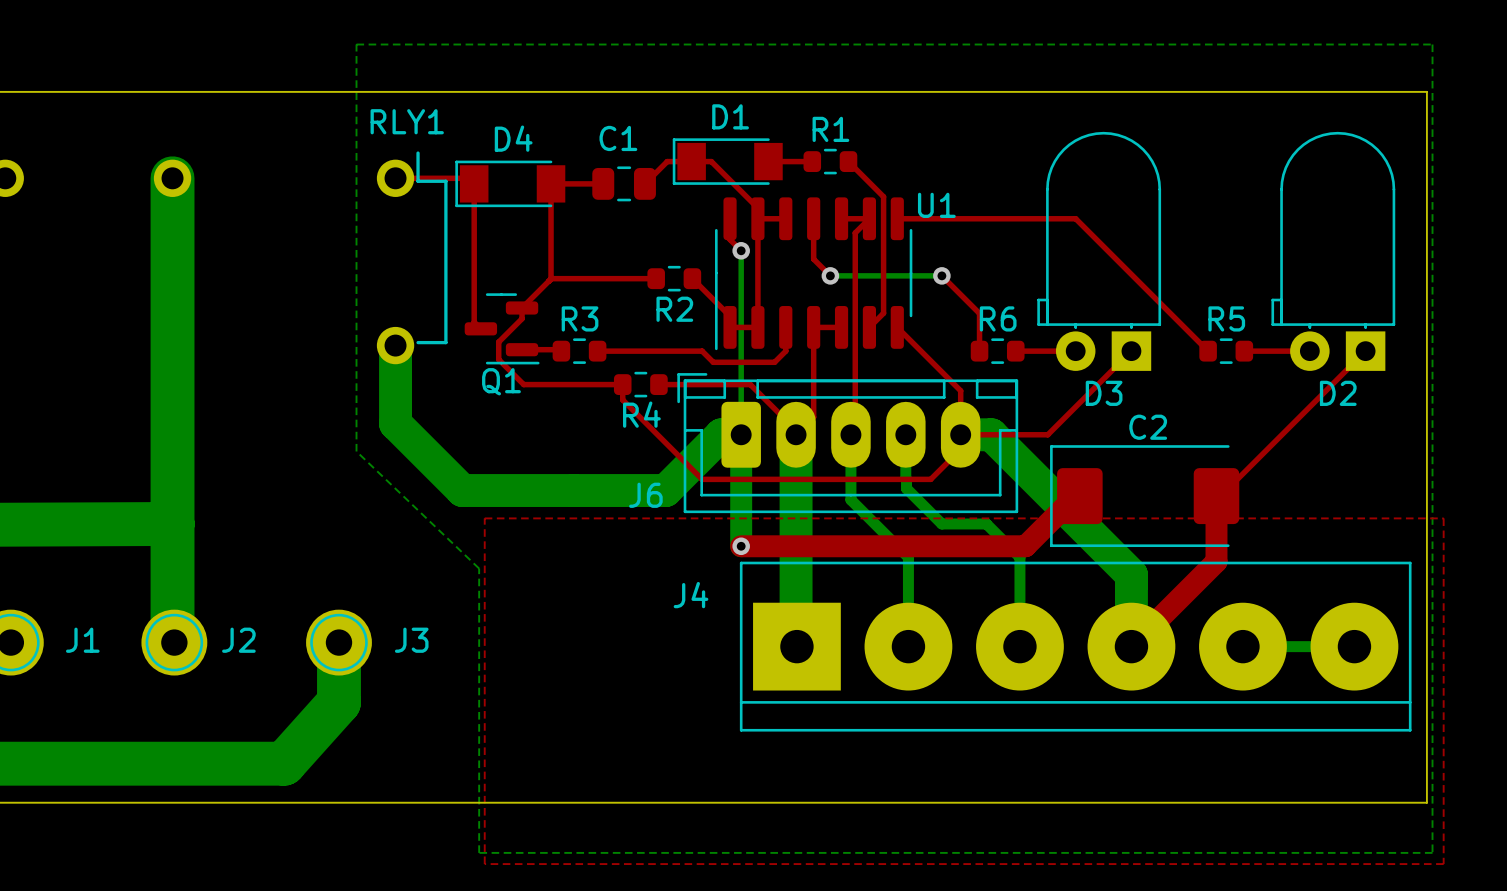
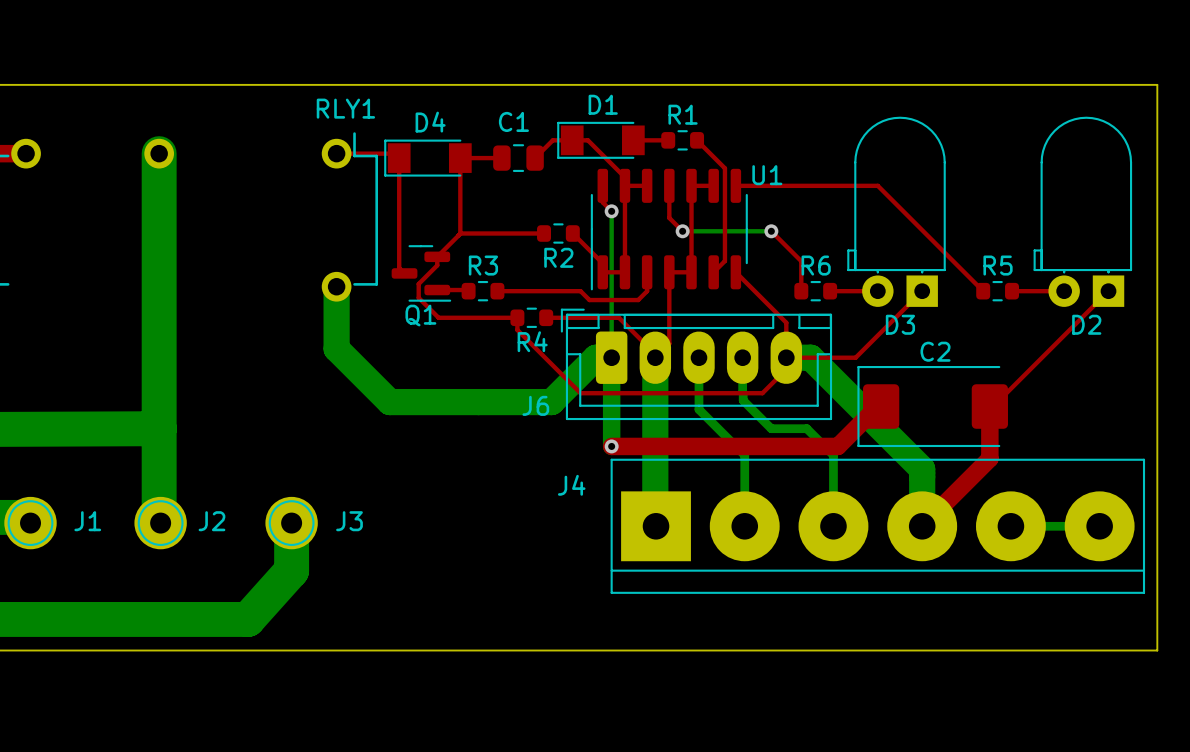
bottom zone outline: (356, 44) (356, 451) (479, 568) (479, 852) (1432, 852) (1432, 44) (356, 44) -> none
top track: none -> (691, 185) (691, 272)
top track: (869, 218) (855, 232) (855, 430) (850, 434) -> none
top zone outline: (484, 518) (484, 864) (1443, 864) (1443, 518) (484, 518) -> none

